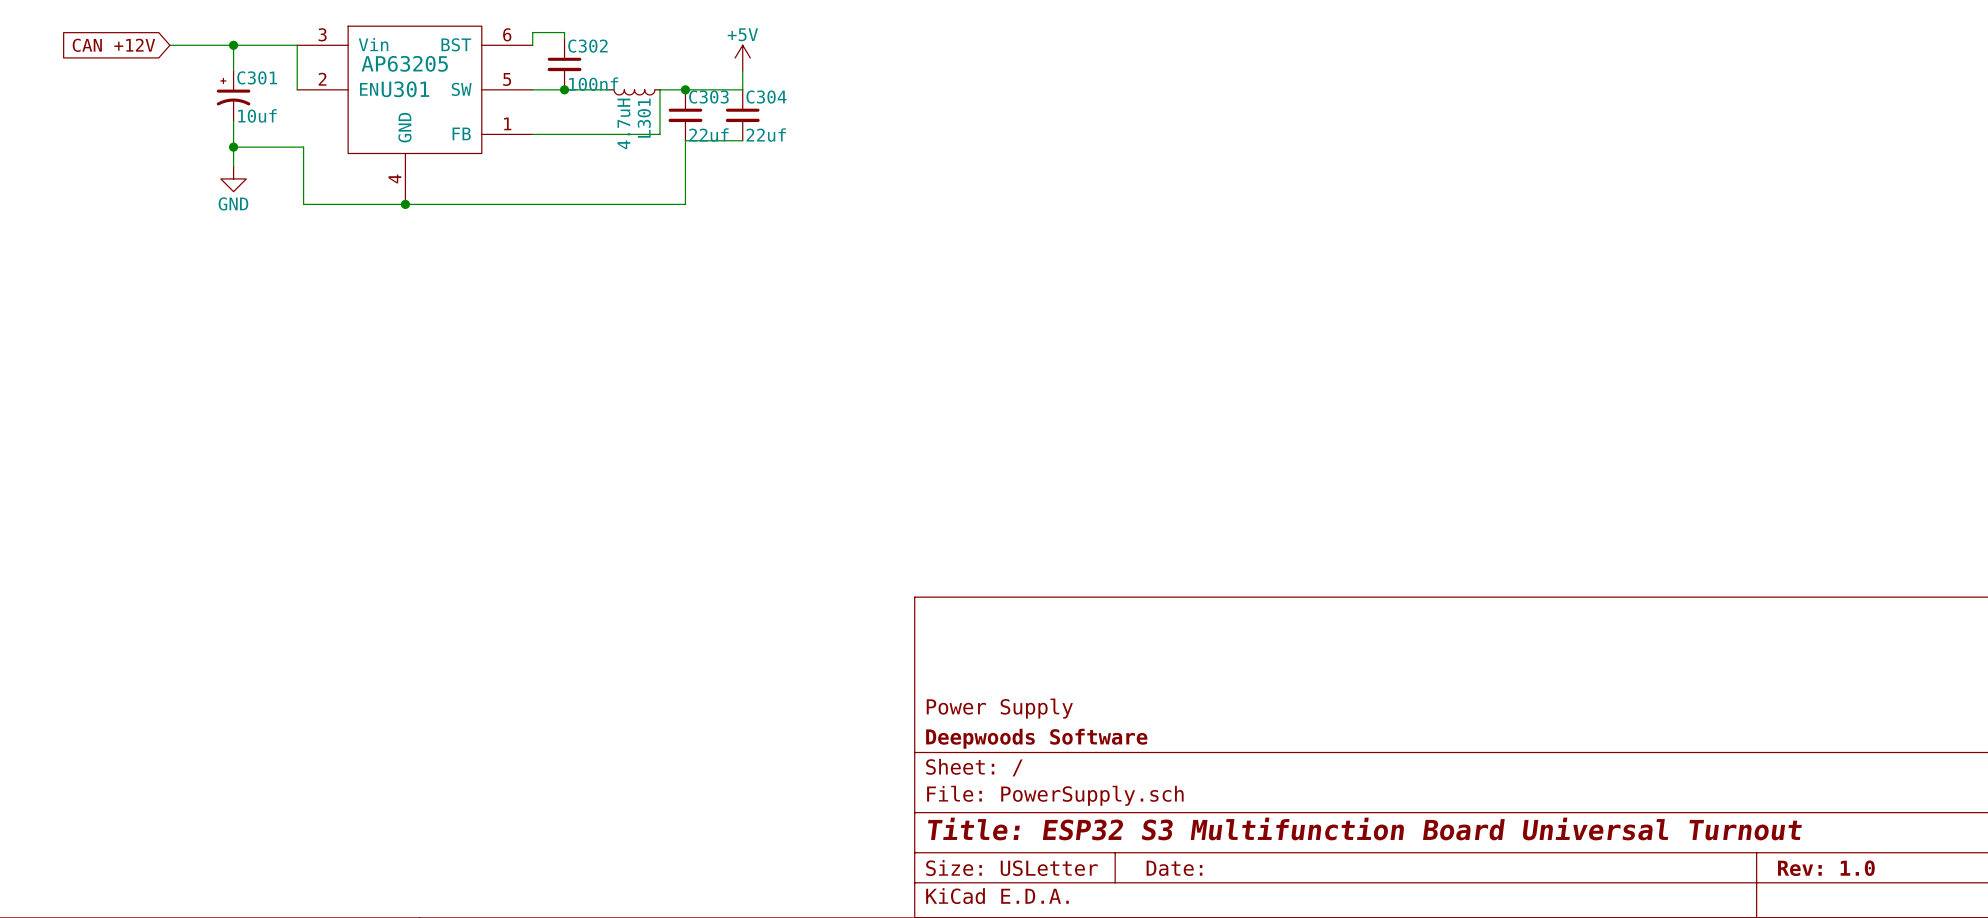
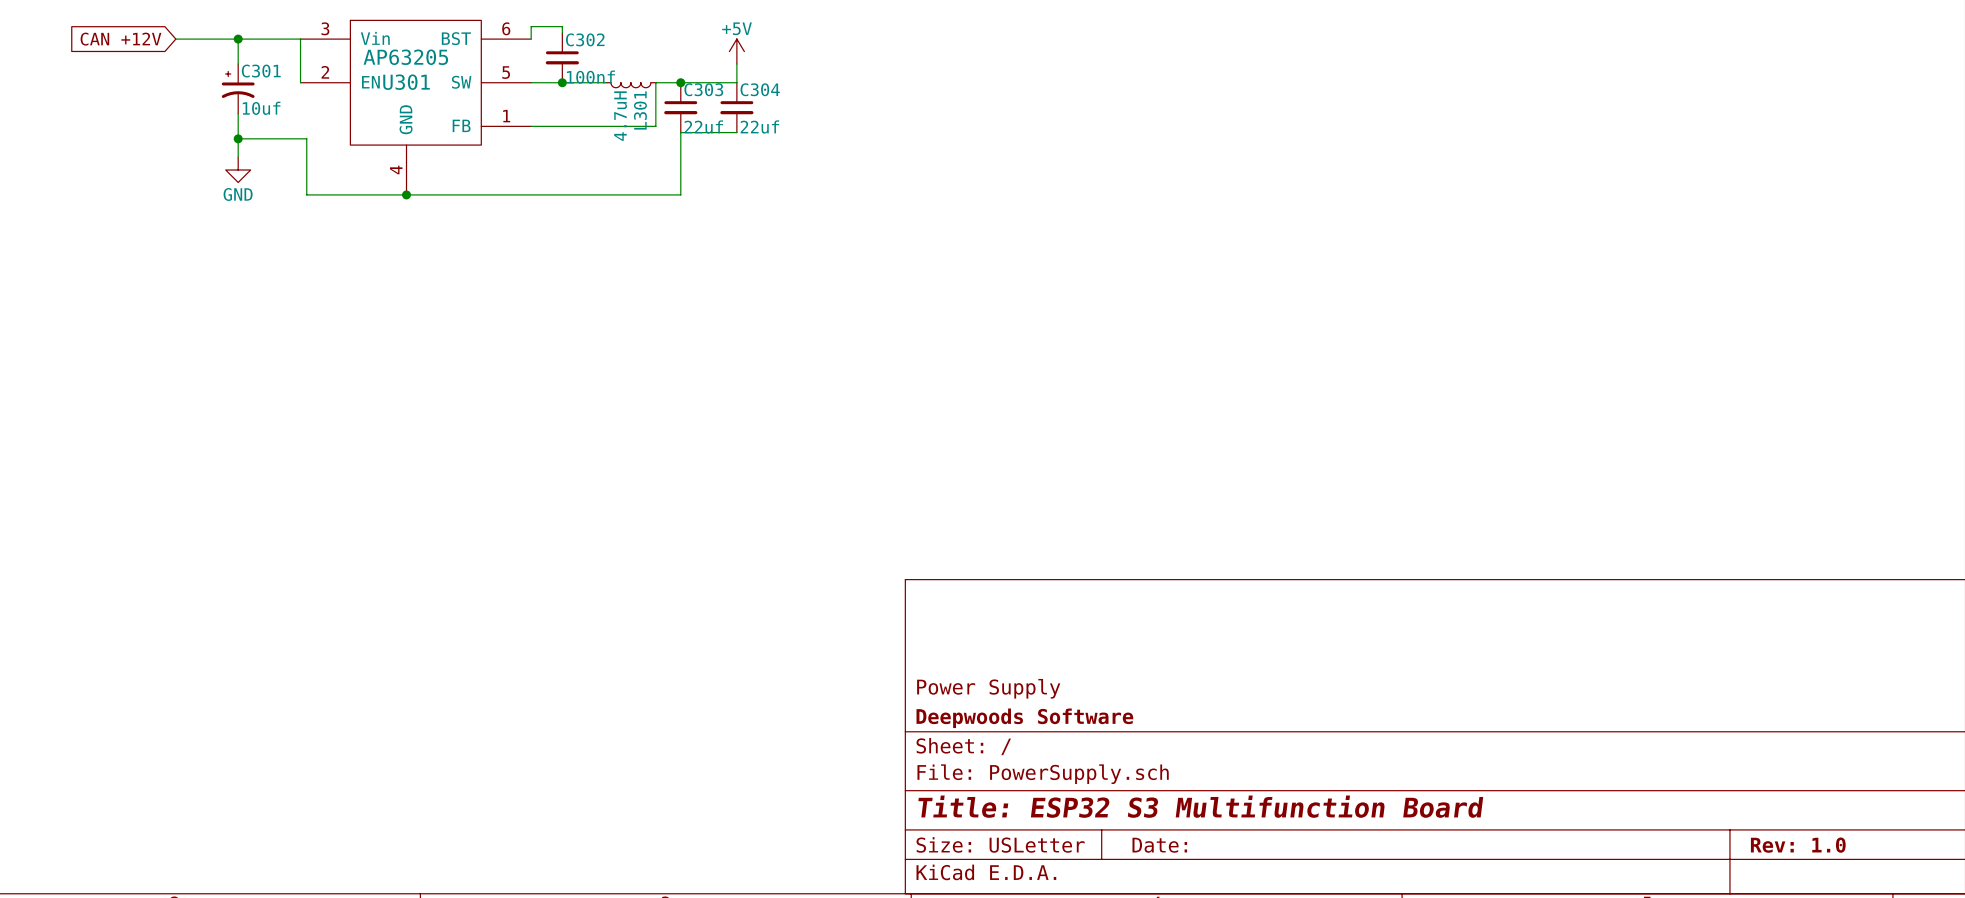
title block: Title: ESP32 S3 Multifunction Board Universal Turnout (1364, 828) -> Title: ESP32 S3 Multifunction Board (1200, 806)

